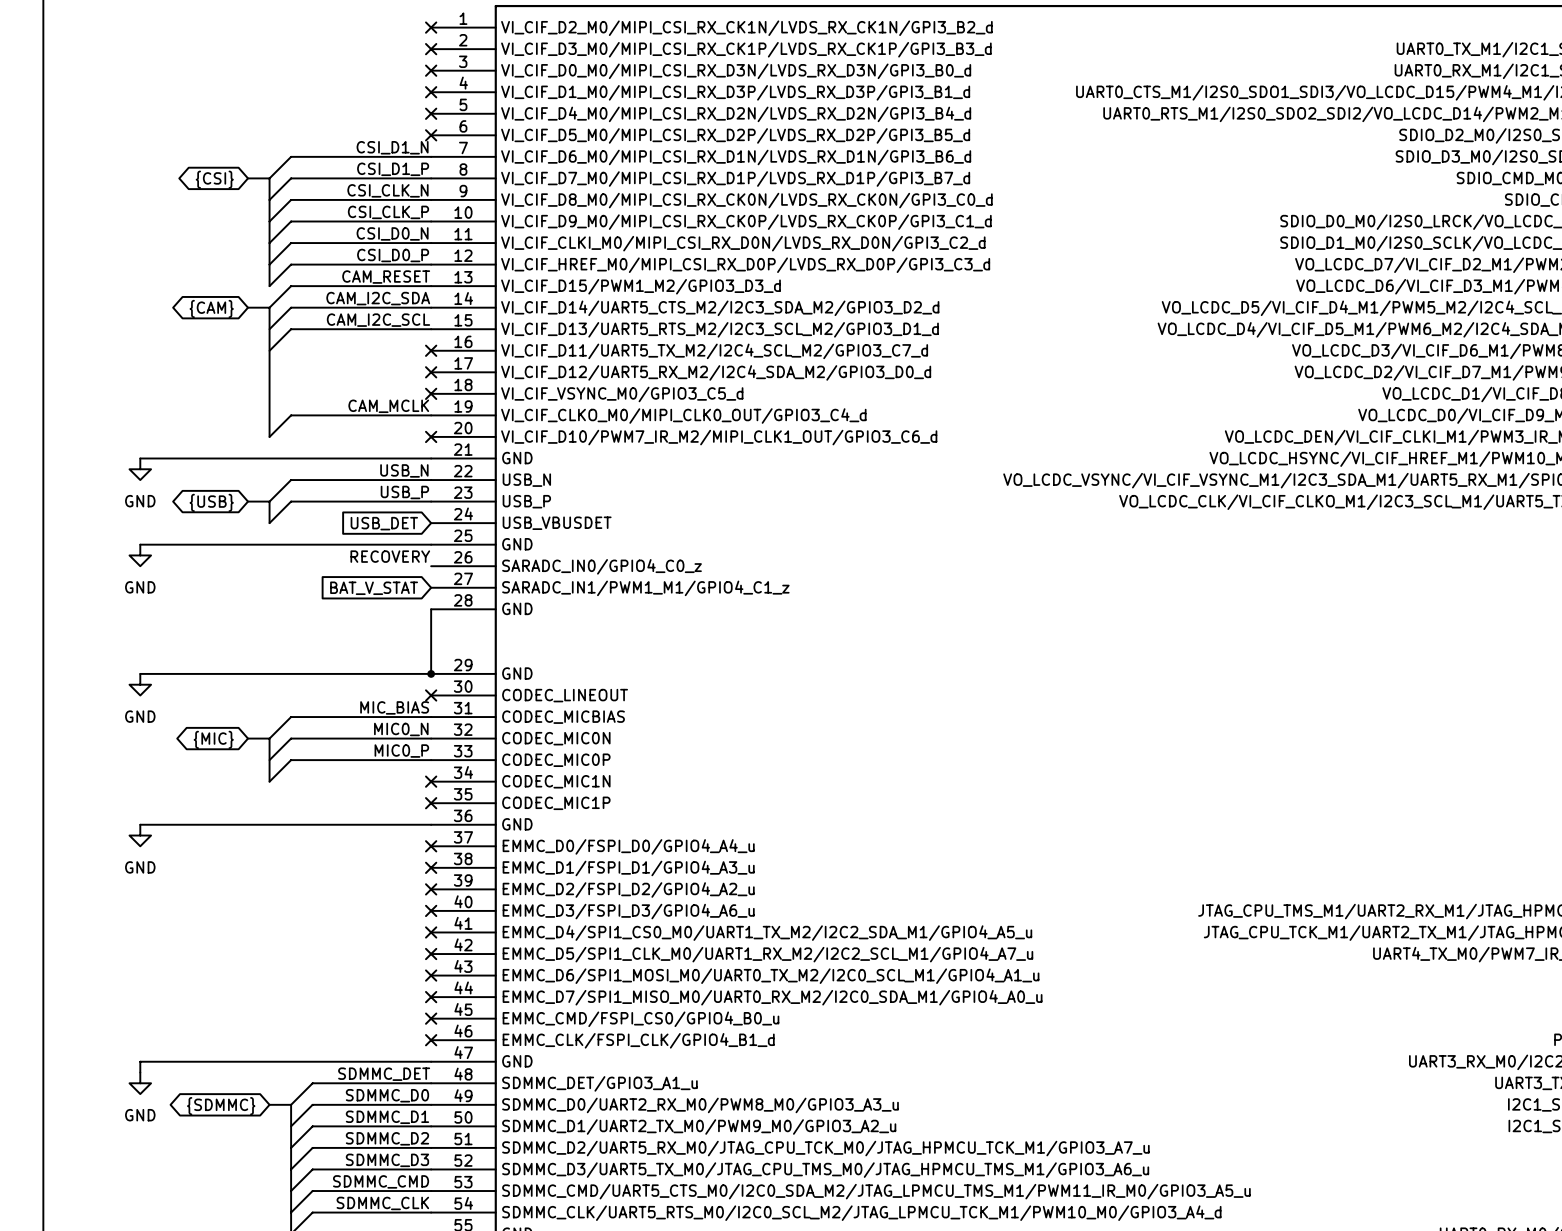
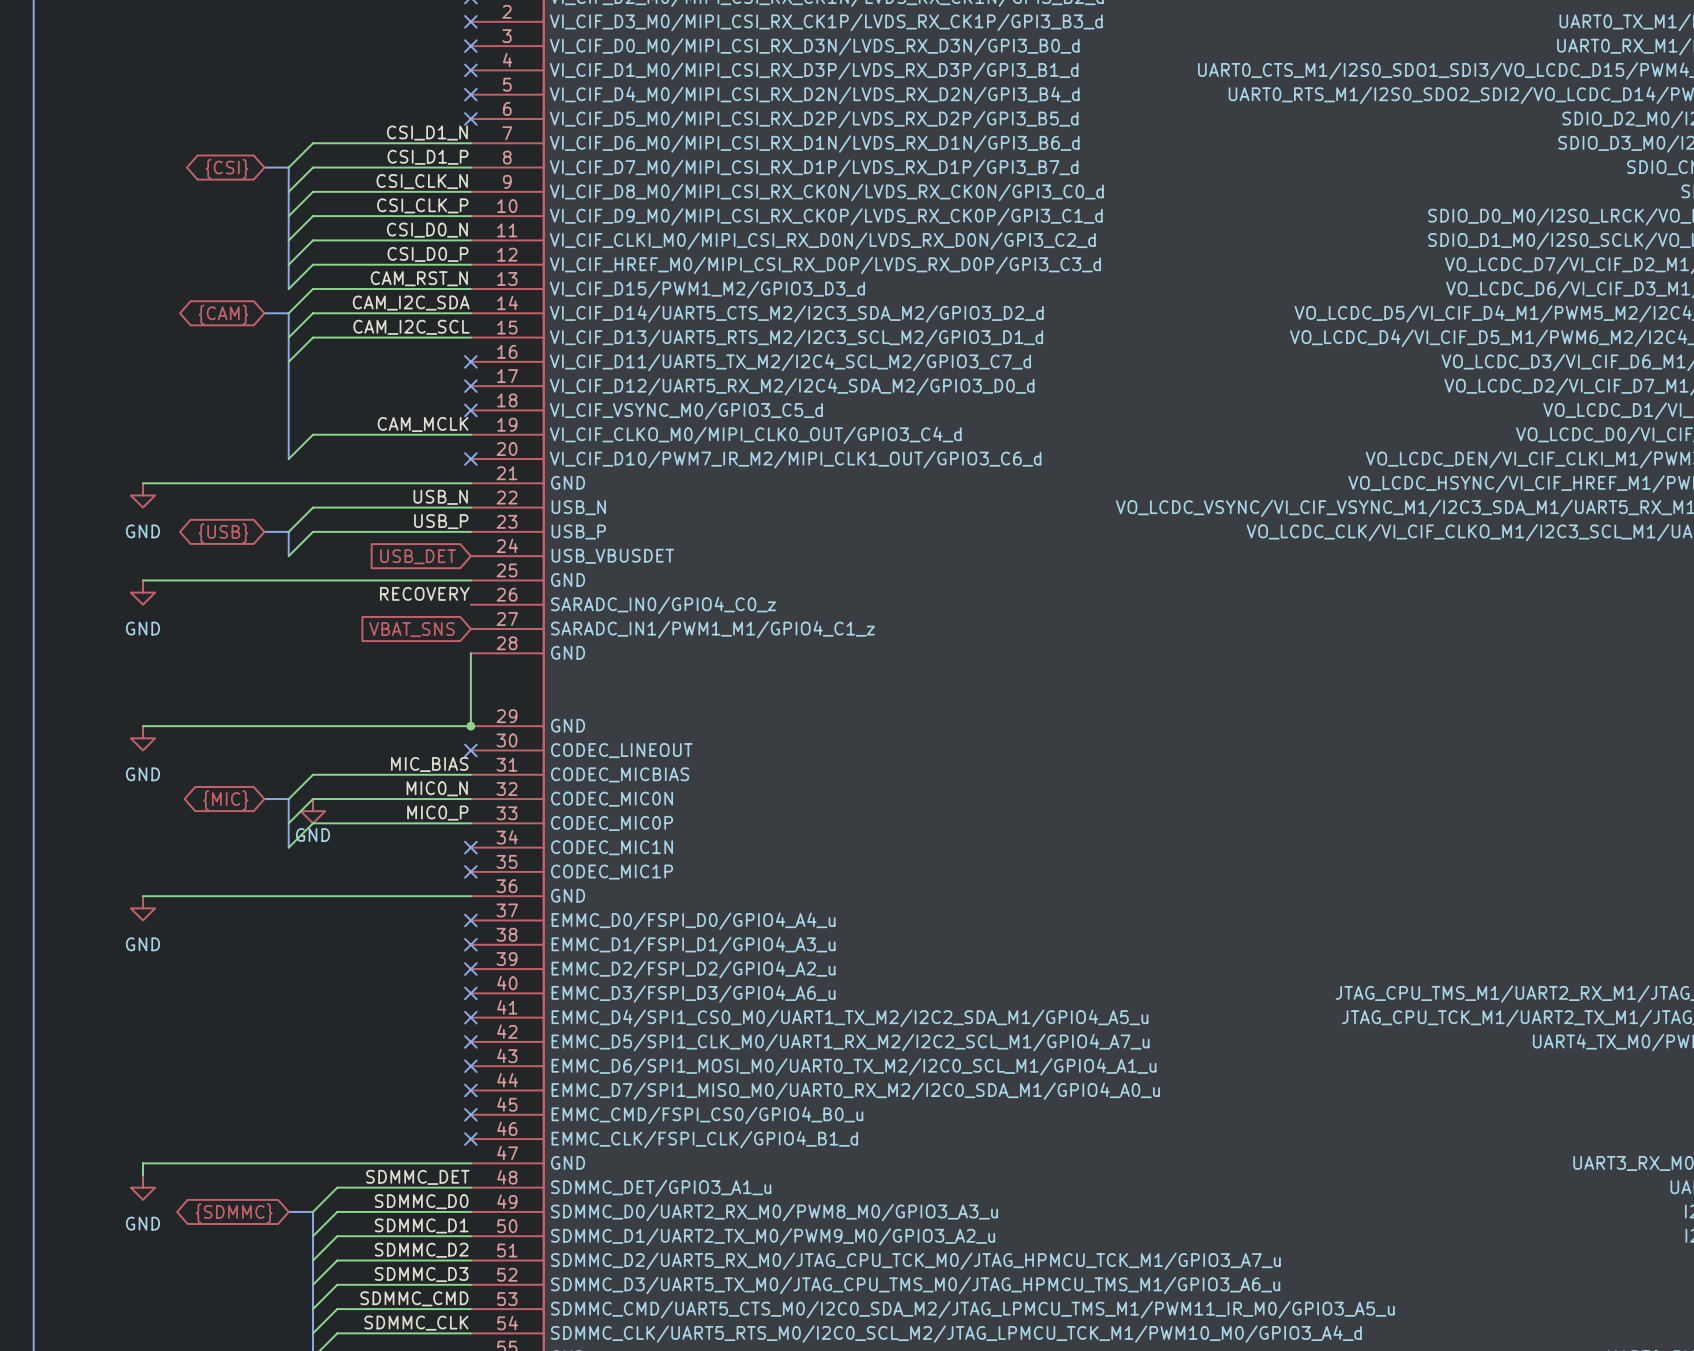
label: CAM_RESET (386, 277) -> CAM_RST_N (419, 278)
global label: BAT_V_STAT (374, 588) -> VBAT_SNS (412, 629)
power symbol: none -> GND (313, 811)

